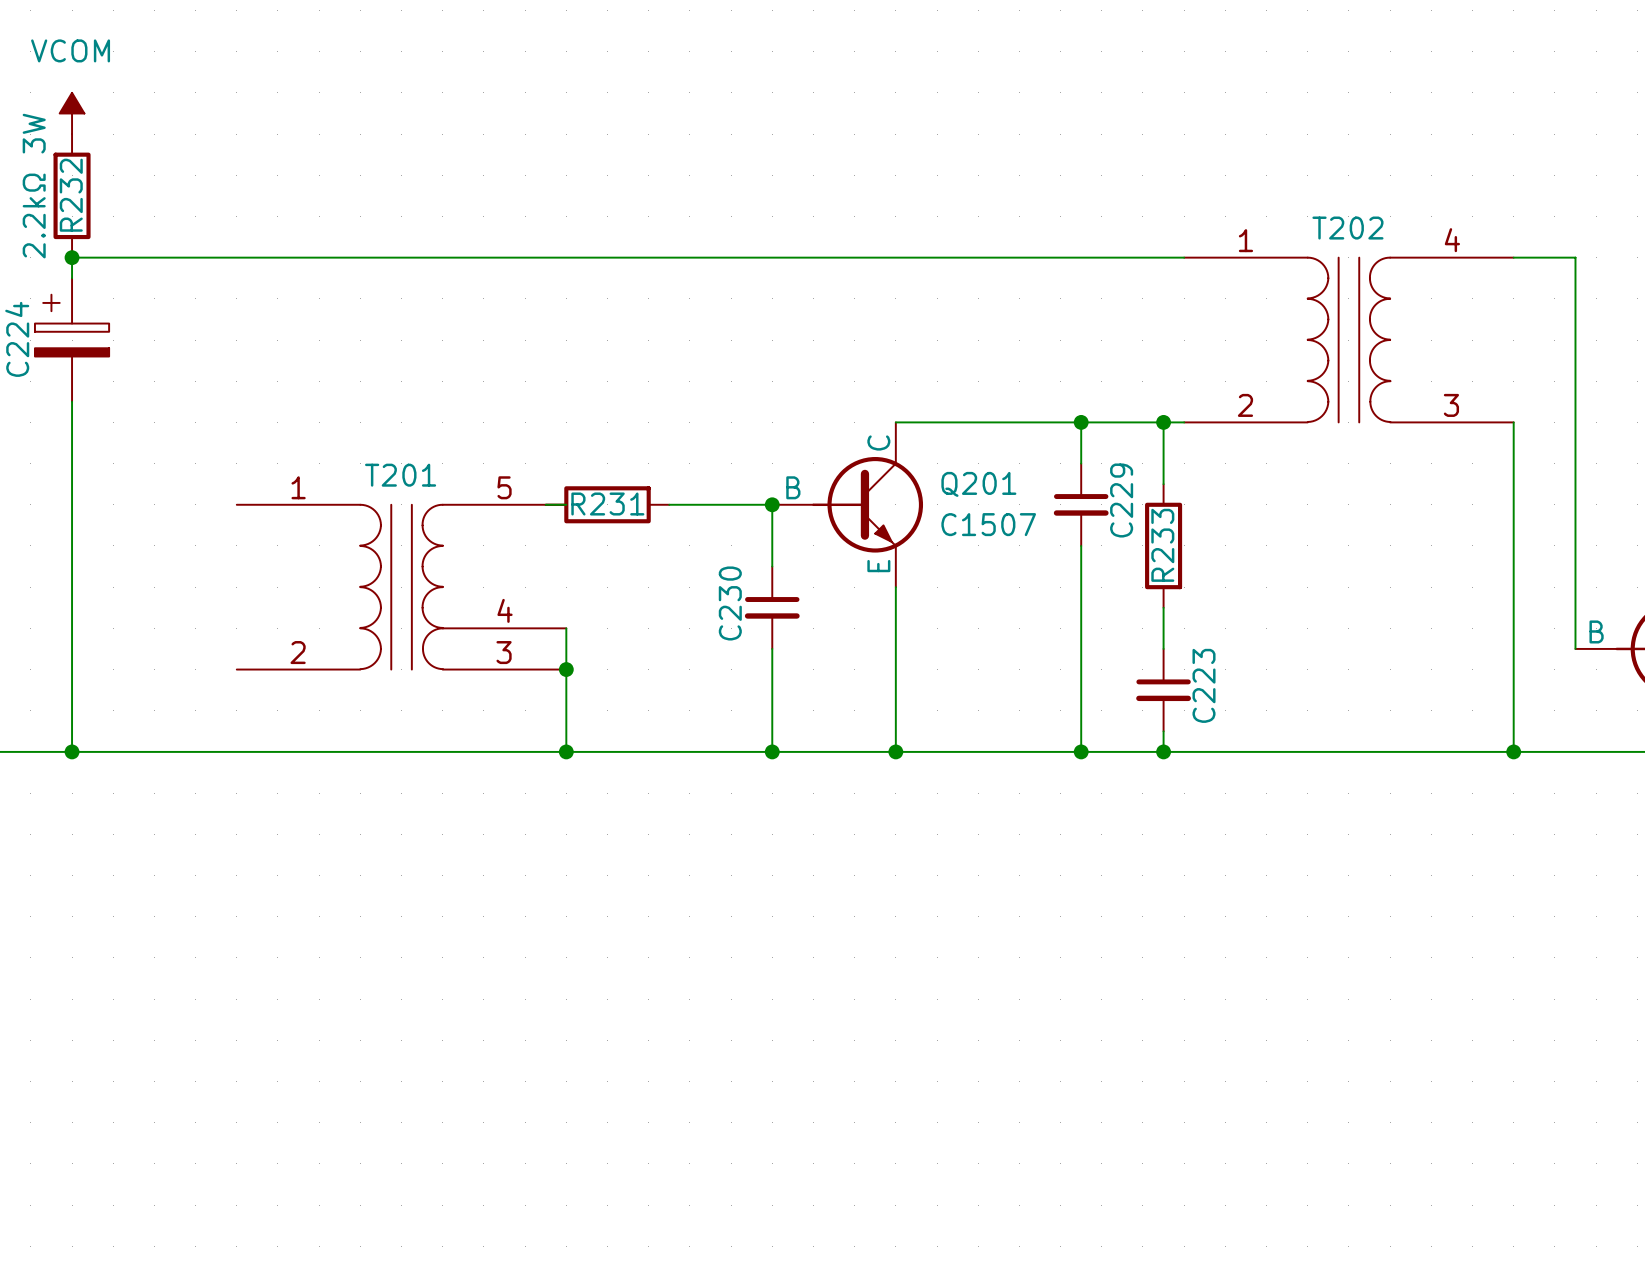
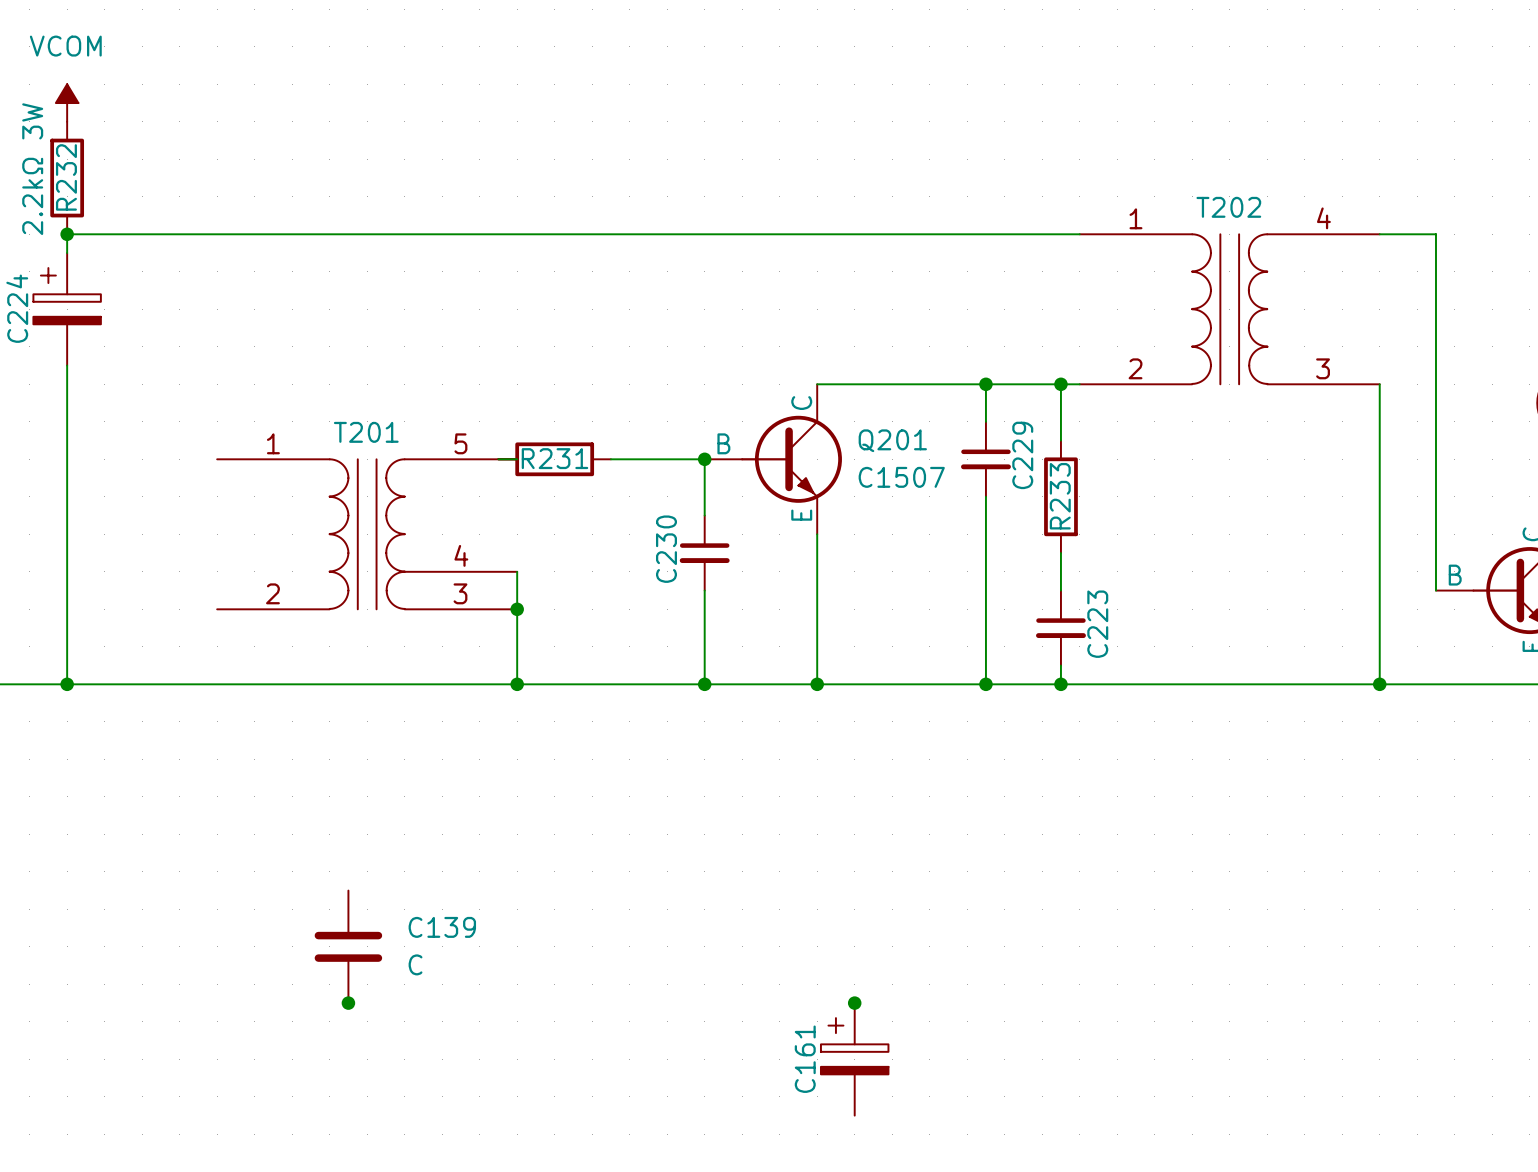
C139: none -> C (348, 946)
junction: none -> (348, 1003)
junction: none -> (854, 1003)
C161: none -> (854, 1059)

